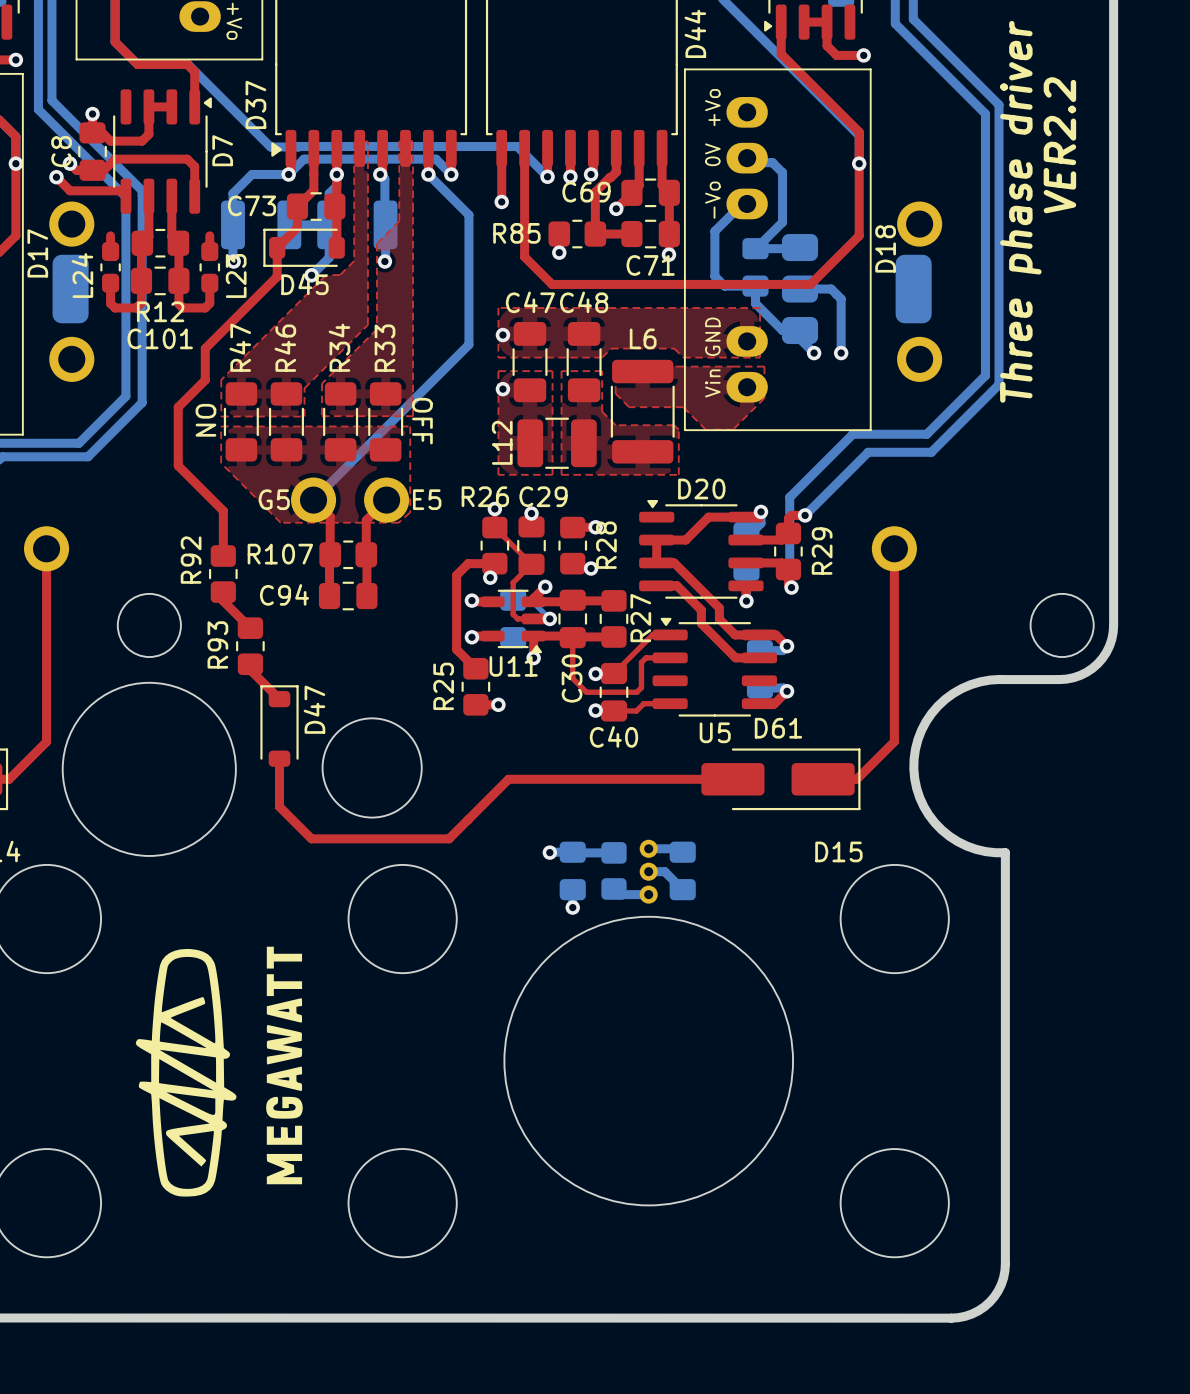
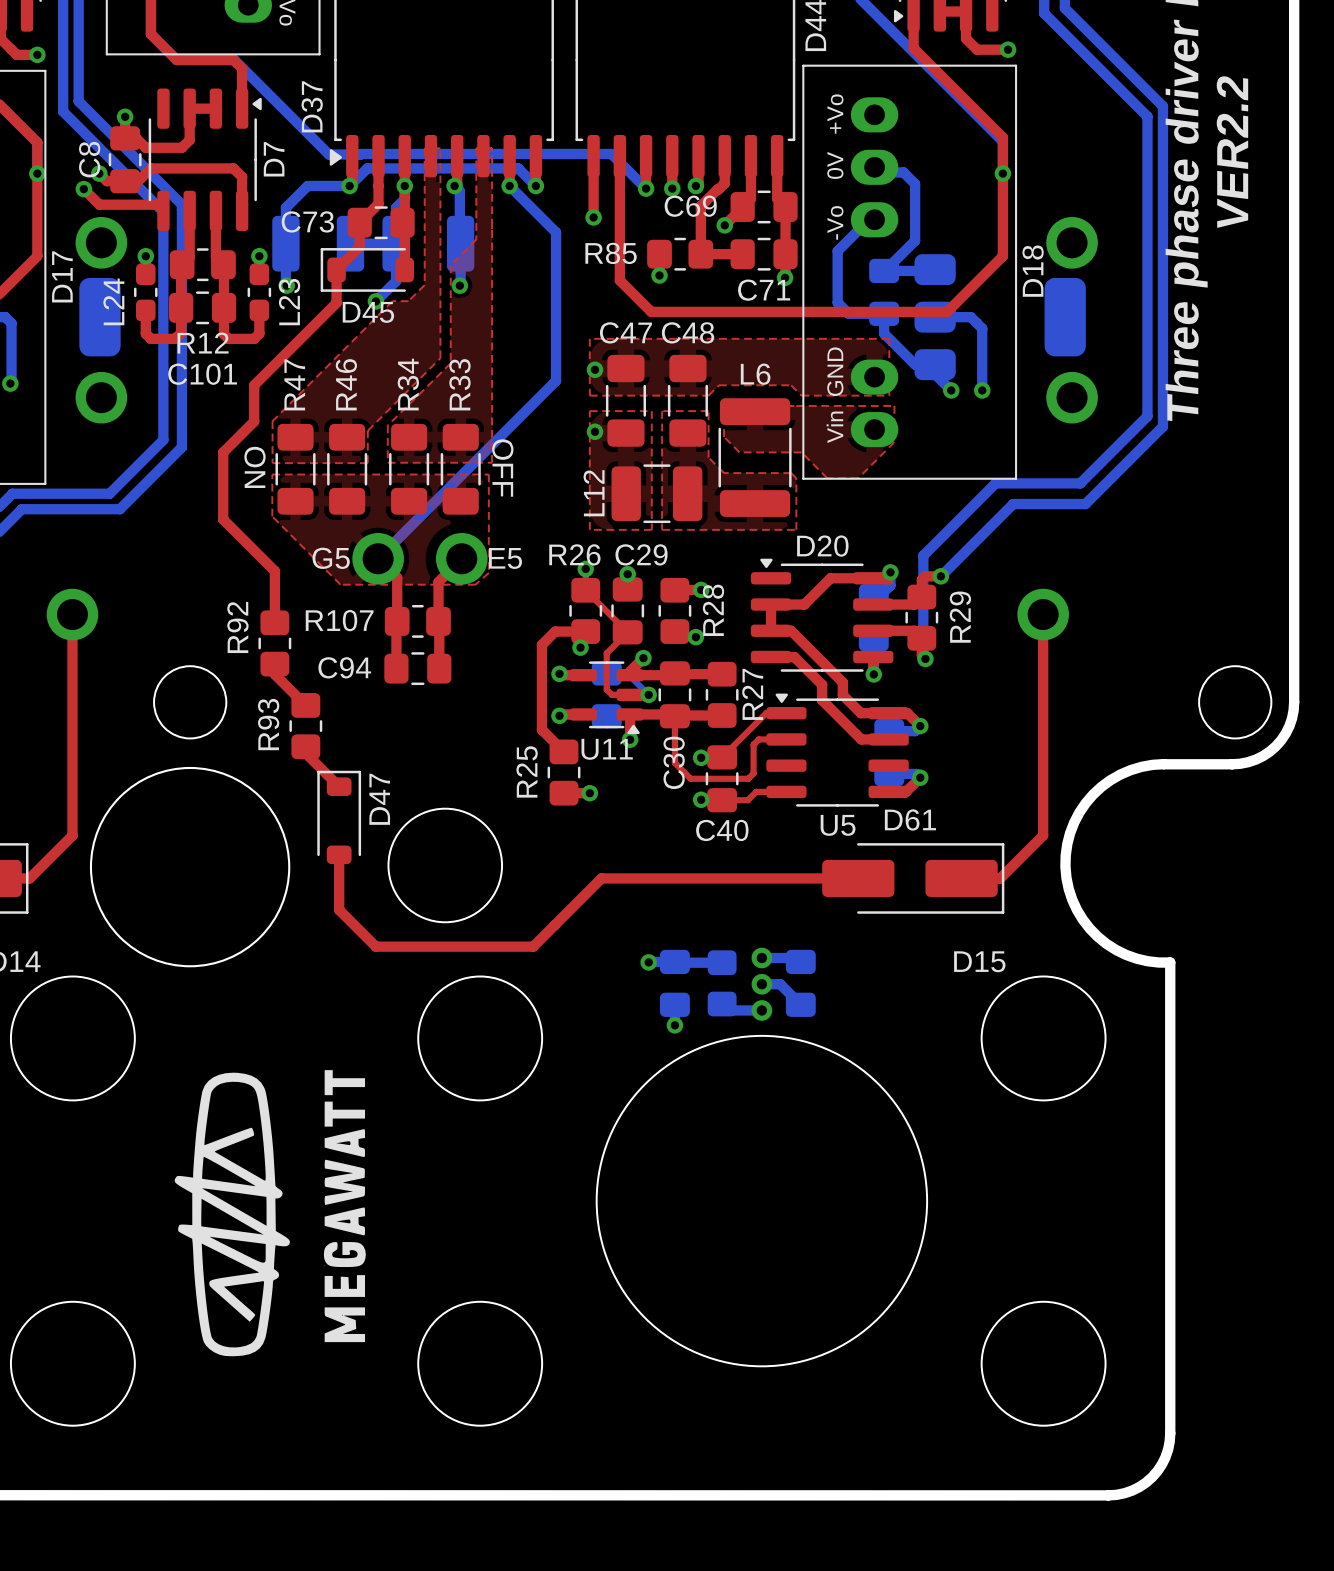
via: none -> (145, 256)
via: none -> (259, 256)

